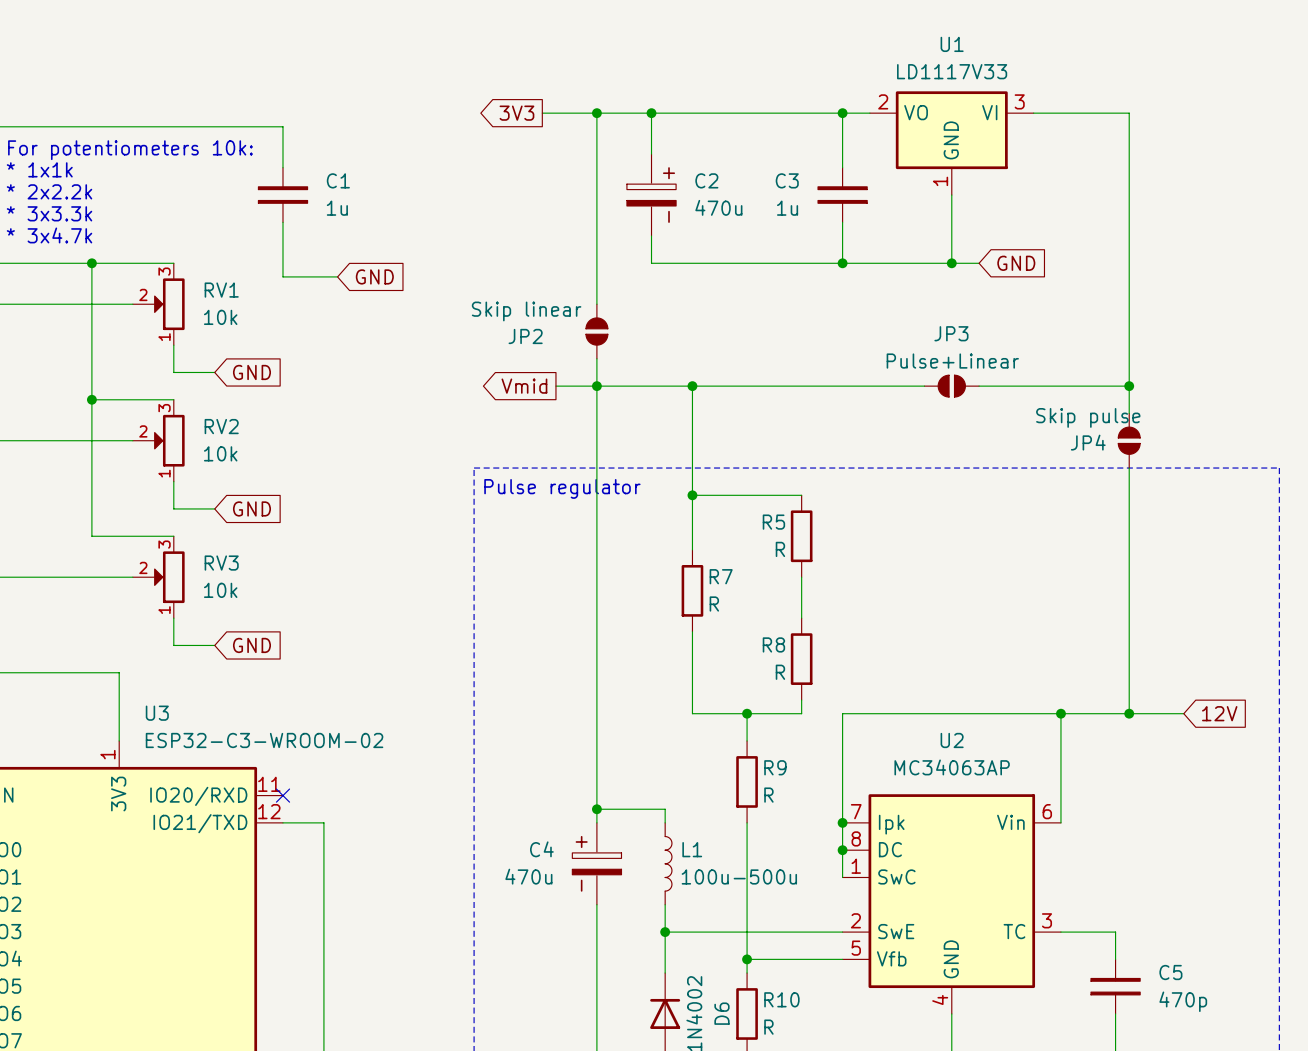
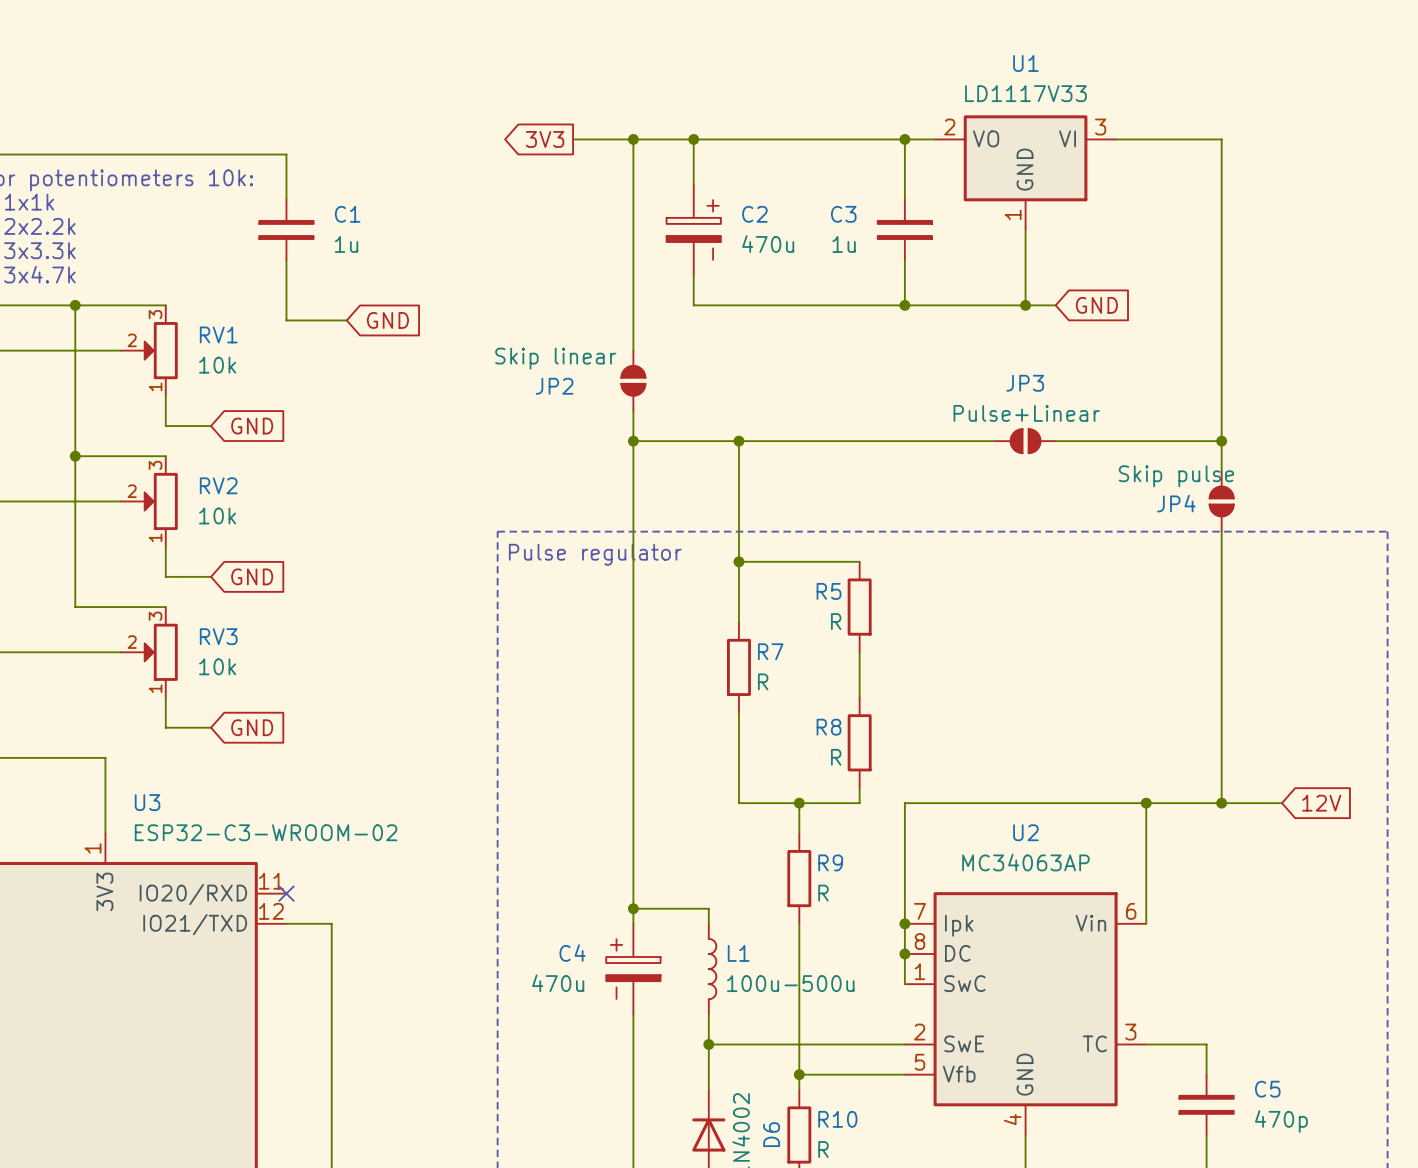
global label: Vmid (524, 386) -> none
wire: (555, 386) (596, 386) -> none

